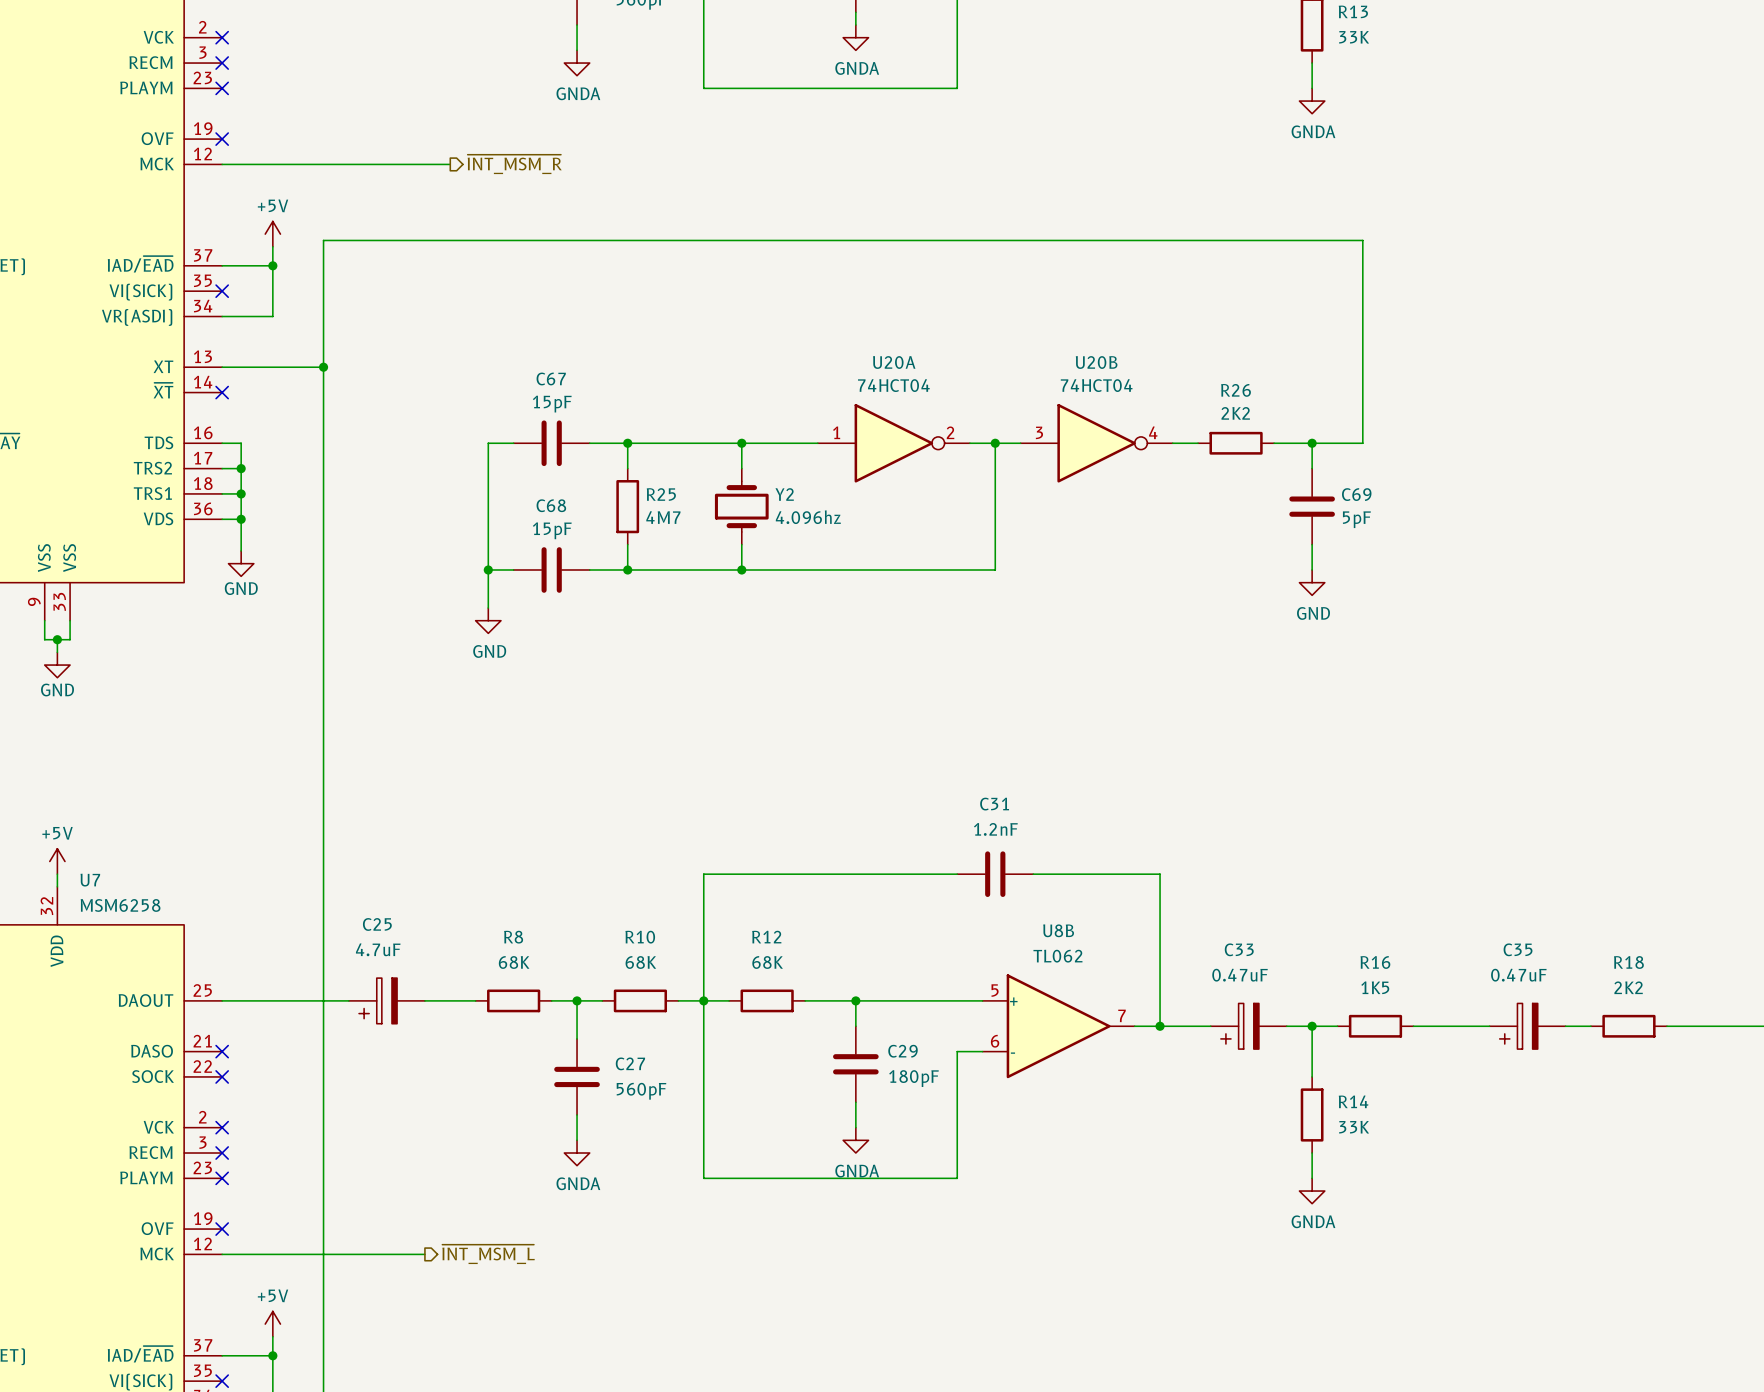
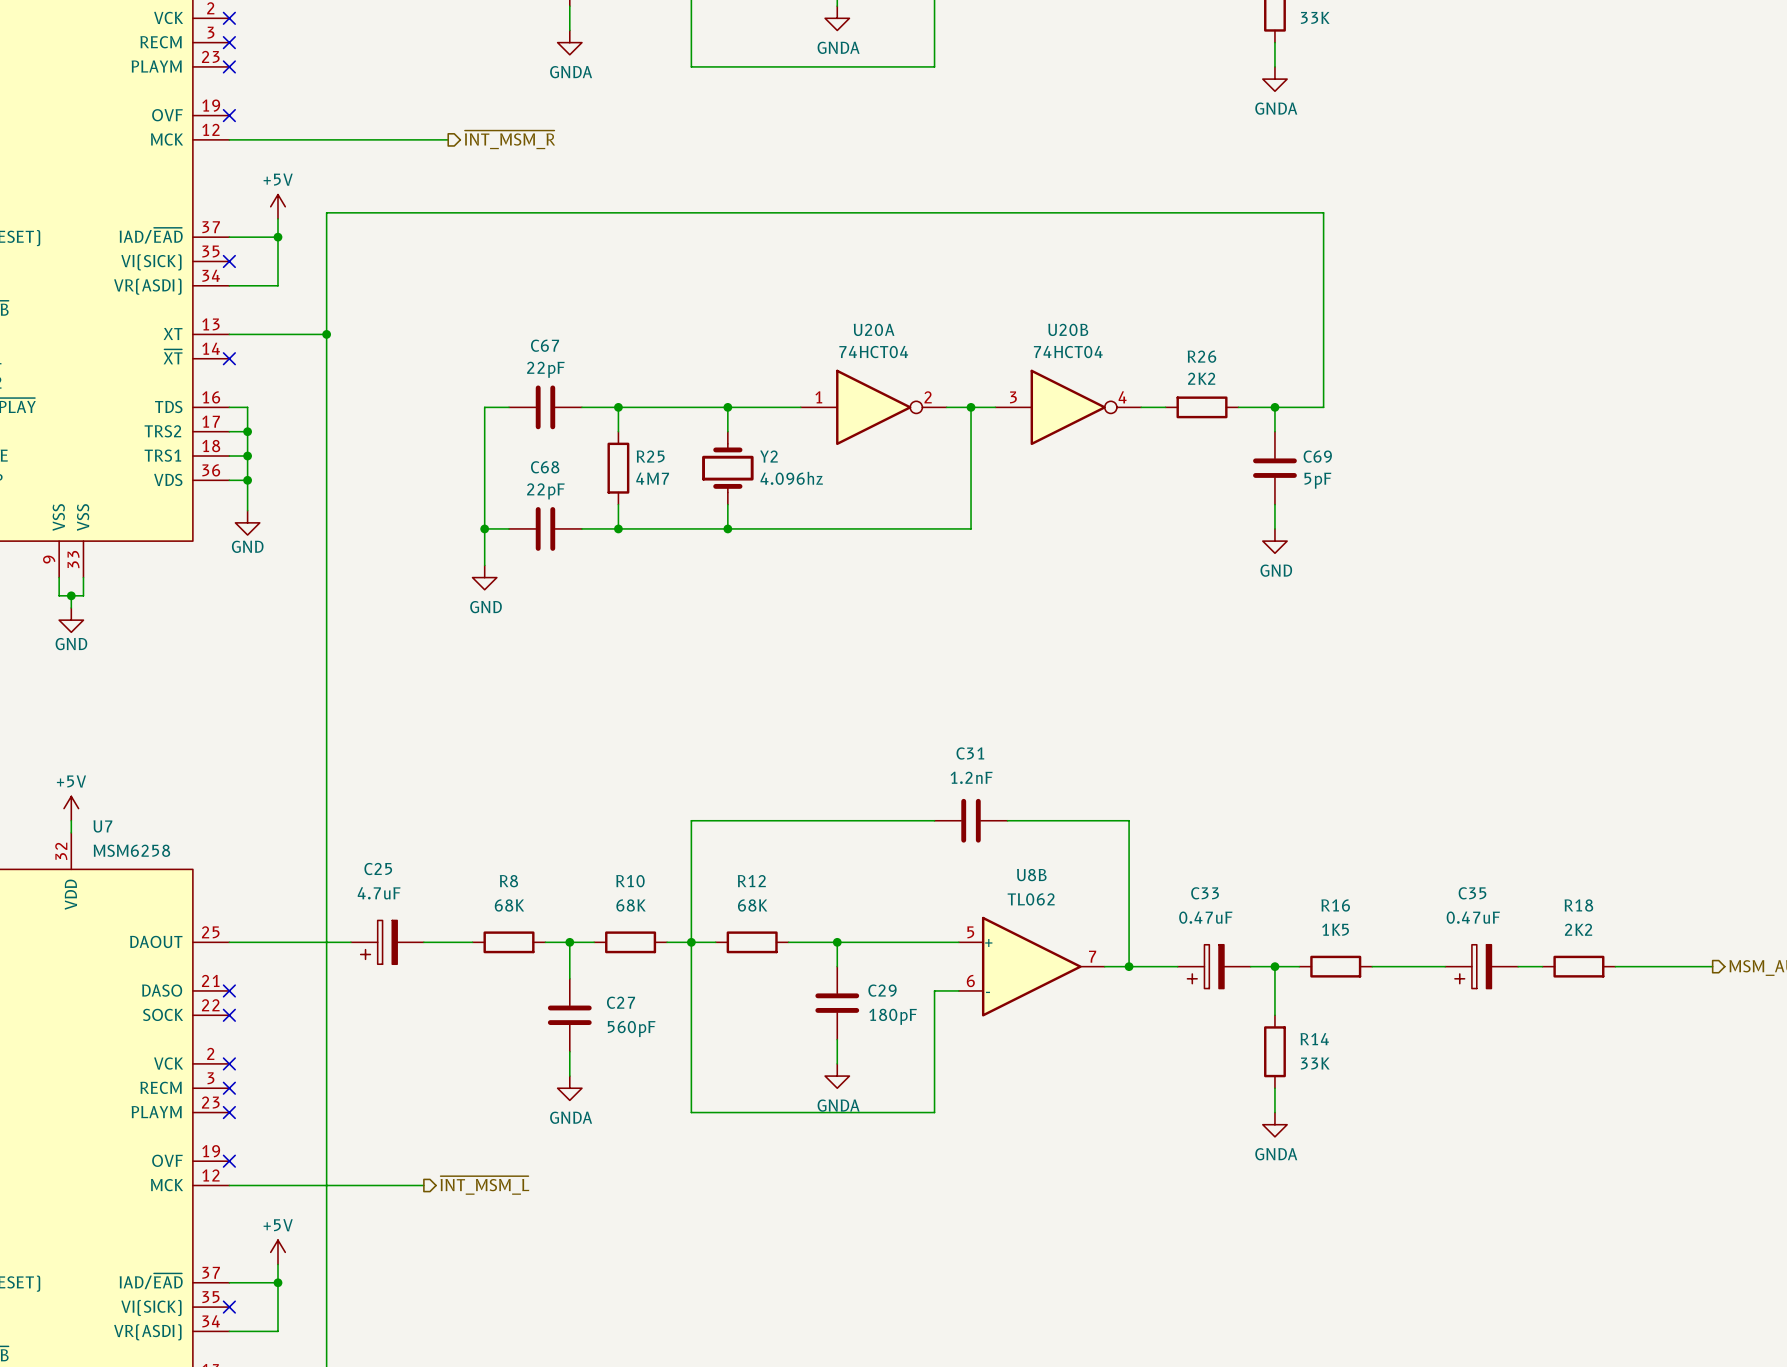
C67 value: 15pF (552, 404) -> 22pF (545, 369)
C68 value: 15pF (552, 530) -> 22pF (545, 491)

